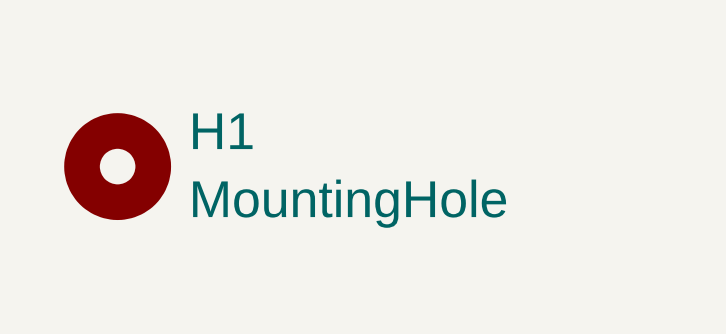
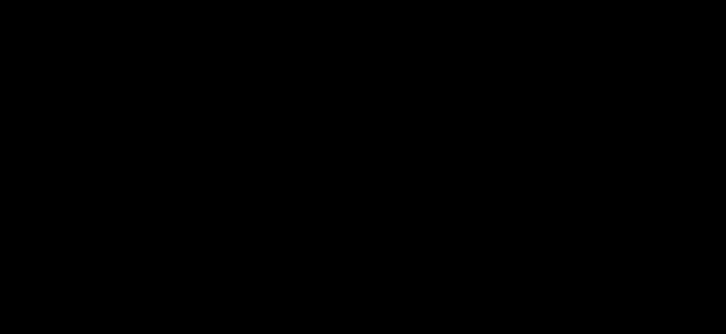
H1: MountingHole (117, 166) -> none

